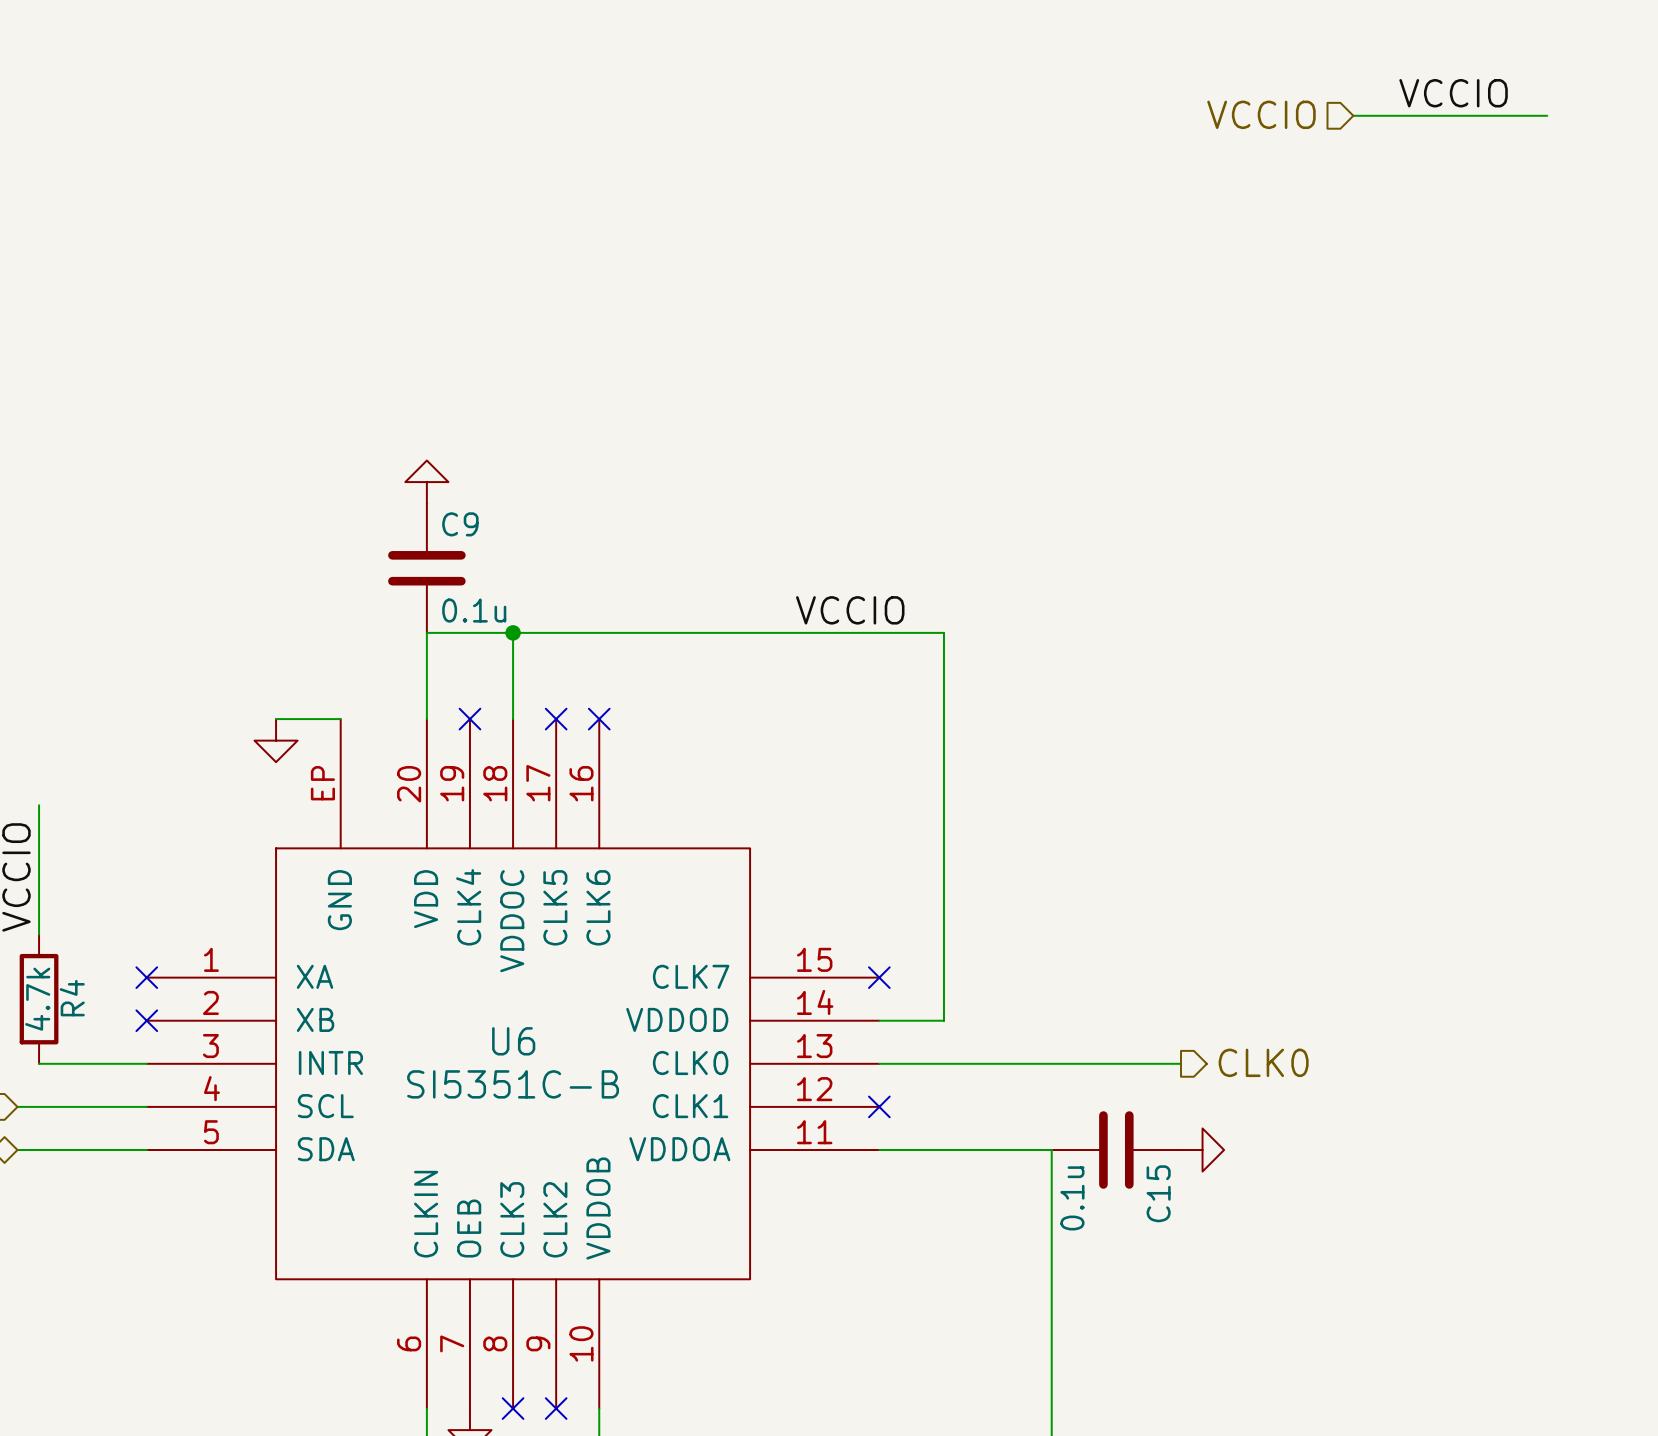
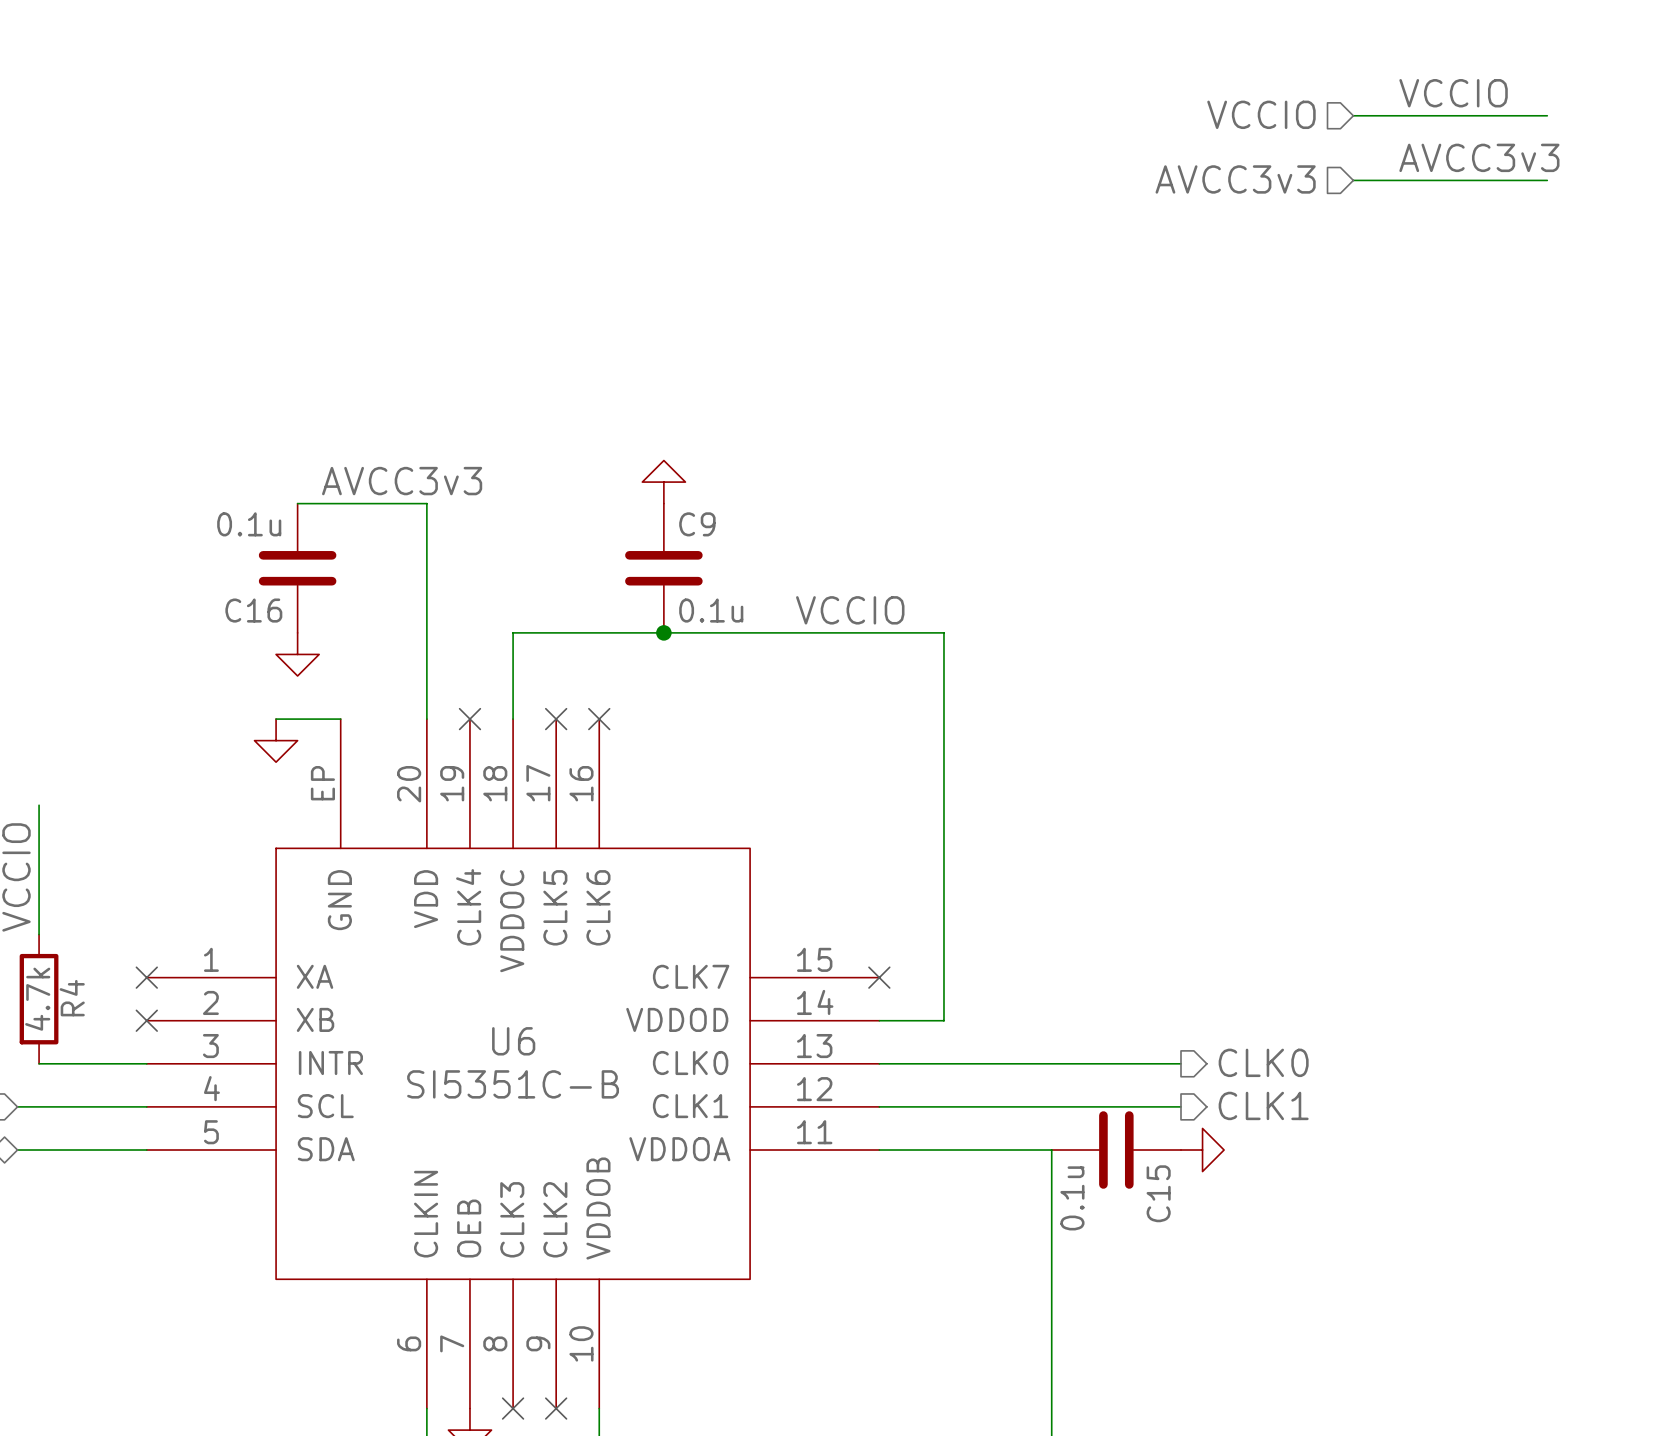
label: none -> AVCC3v3 (1479, 157)
hierarchical label: none -> AVCC3v3 (1235, 179)
wire: none -> (1353, 180) (1547, 180)
label: none -> AVCC3v3 (402, 481)
power symbol: (426, 482) -> none
power symbol: none -> (663, 482)
C16: none -> 0.1u (297, 568)
C9 position: (426, 568) -> (663, 568)
wire: (426, 632) (513, 632) -> (426, 632) (426, 503) (297, 503)
junction: (513, 632) -> none
junction: none -> (663, 632)
power symbol: none -> (297, 654)
hierarchical label: none -> CLK1 (1263, 1105)
wire: none -> (879, 1106) (1180, 1106)
no-connect mark: (879, 1106) -> none

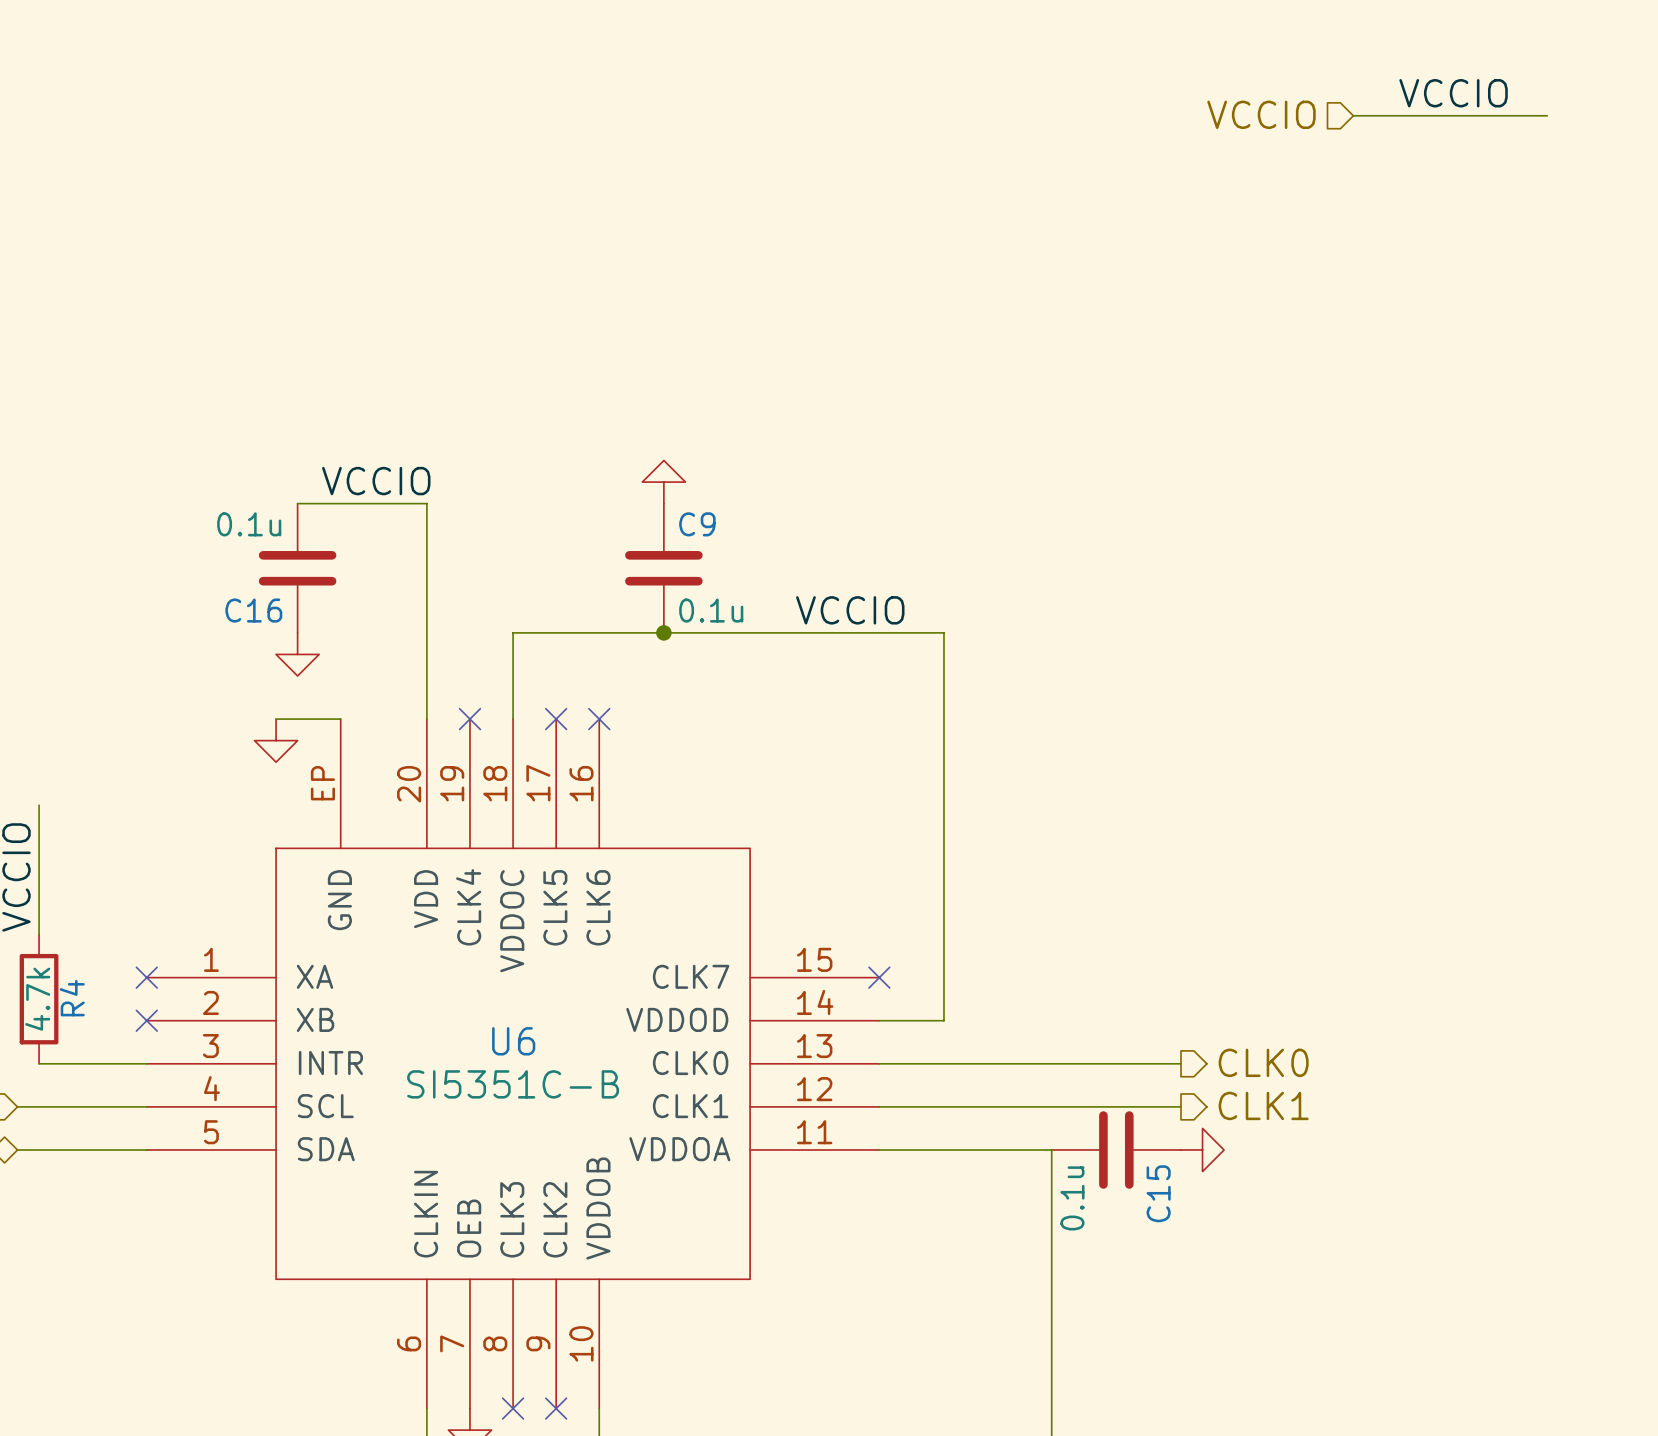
label: AVCC3v3 (1479, 157) -> none
hierarchical label: AVCC3v3 (1235, 179) -> none
wire: (1353, 180) (1547, 180) -> none
label: AVCC3v3 (402, 481) -> VCCIO (376, 481)

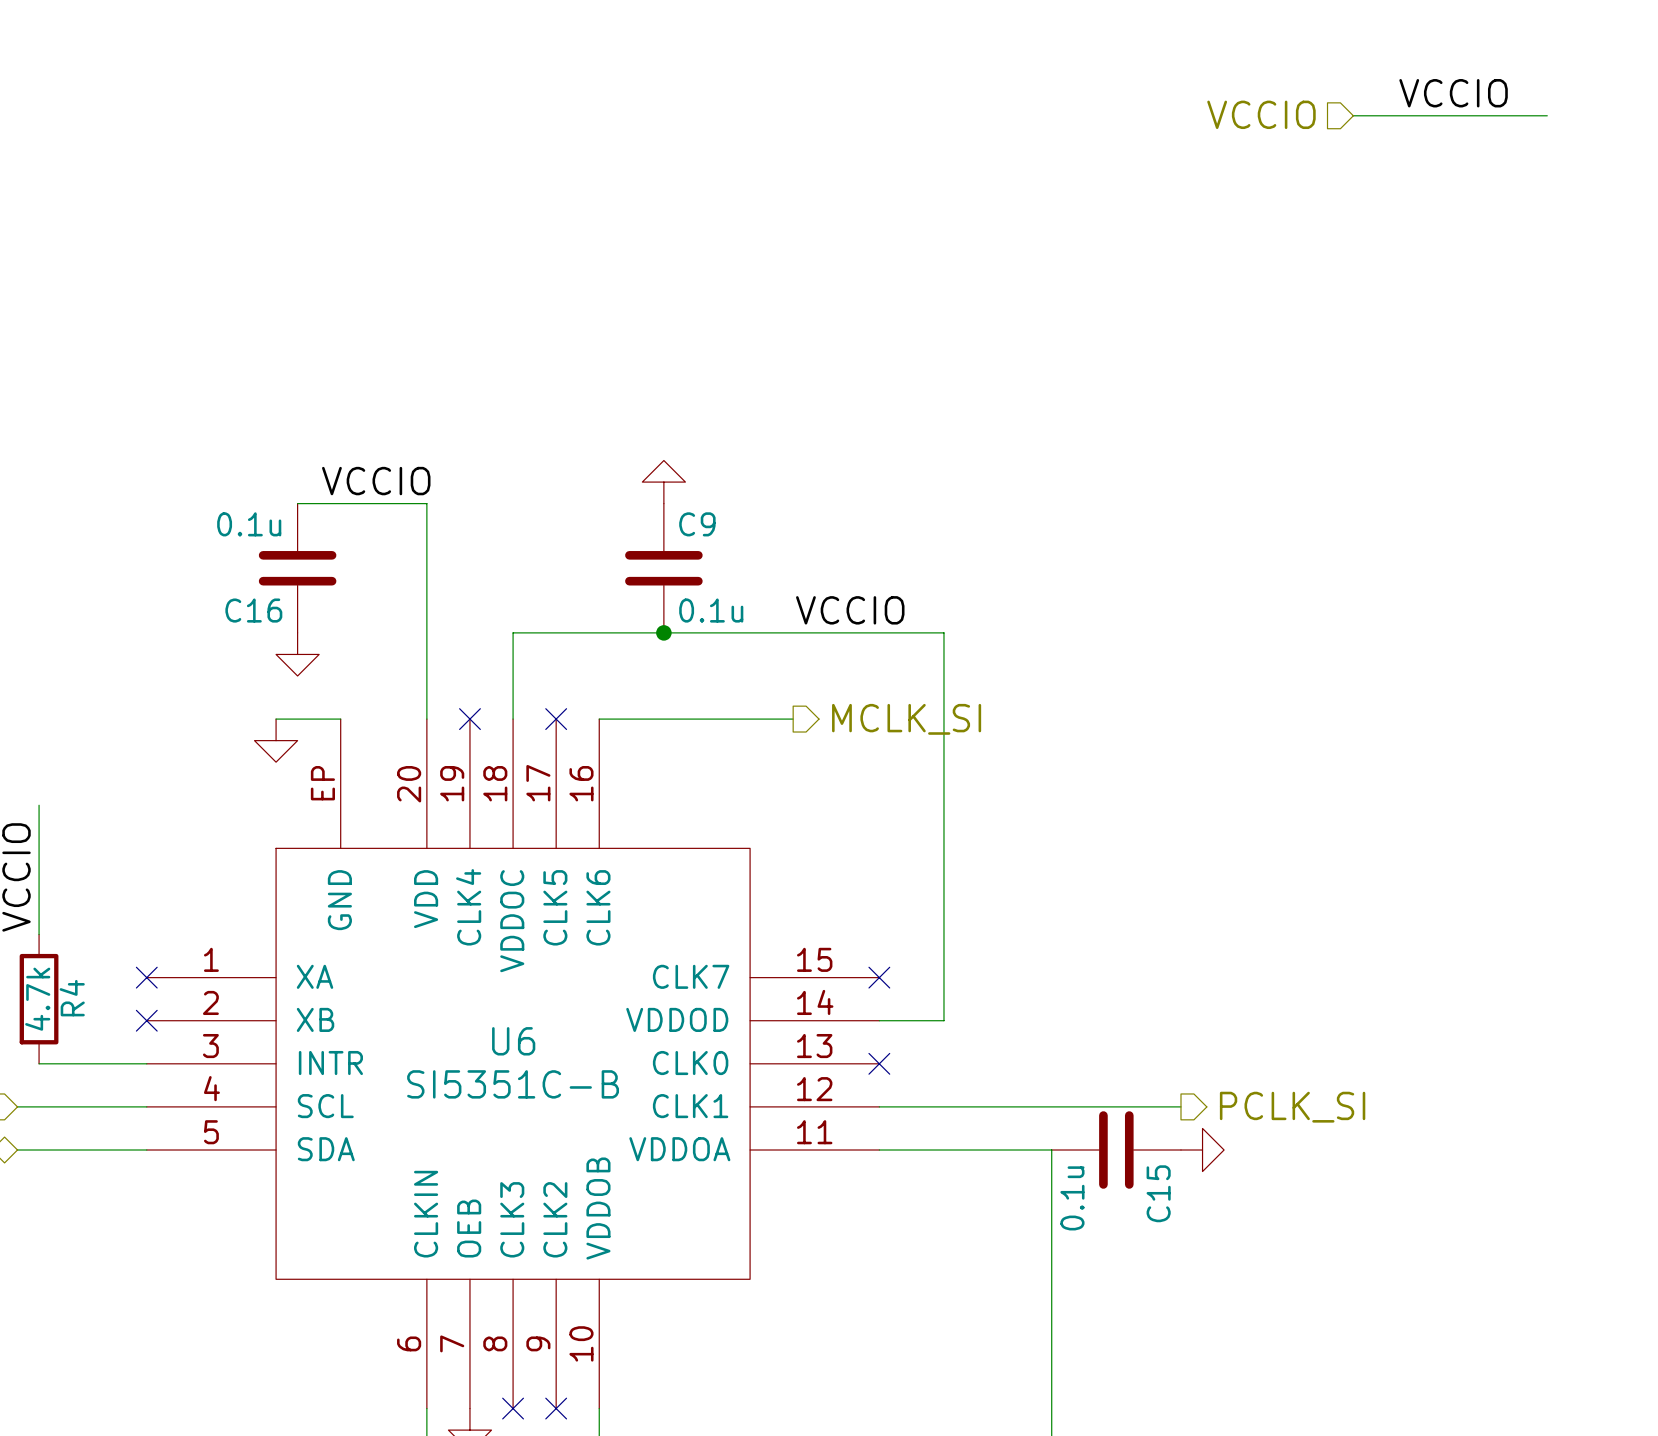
wire: none -> (599, 719) (793, 719)
no-connect mark: (599, 719) -> none
hierarchical label: none -> MCLK_SI (906, 719)
hierarchical label: CLK0 (1263, 1062) -> none
wire: (879, 1063) (1180, 1063) -> none
no-connect mark: none -> (879, 1063)
hierarchical label: CLK1 (1263, 1105) -> PCLK_SI (1292, 1107)

